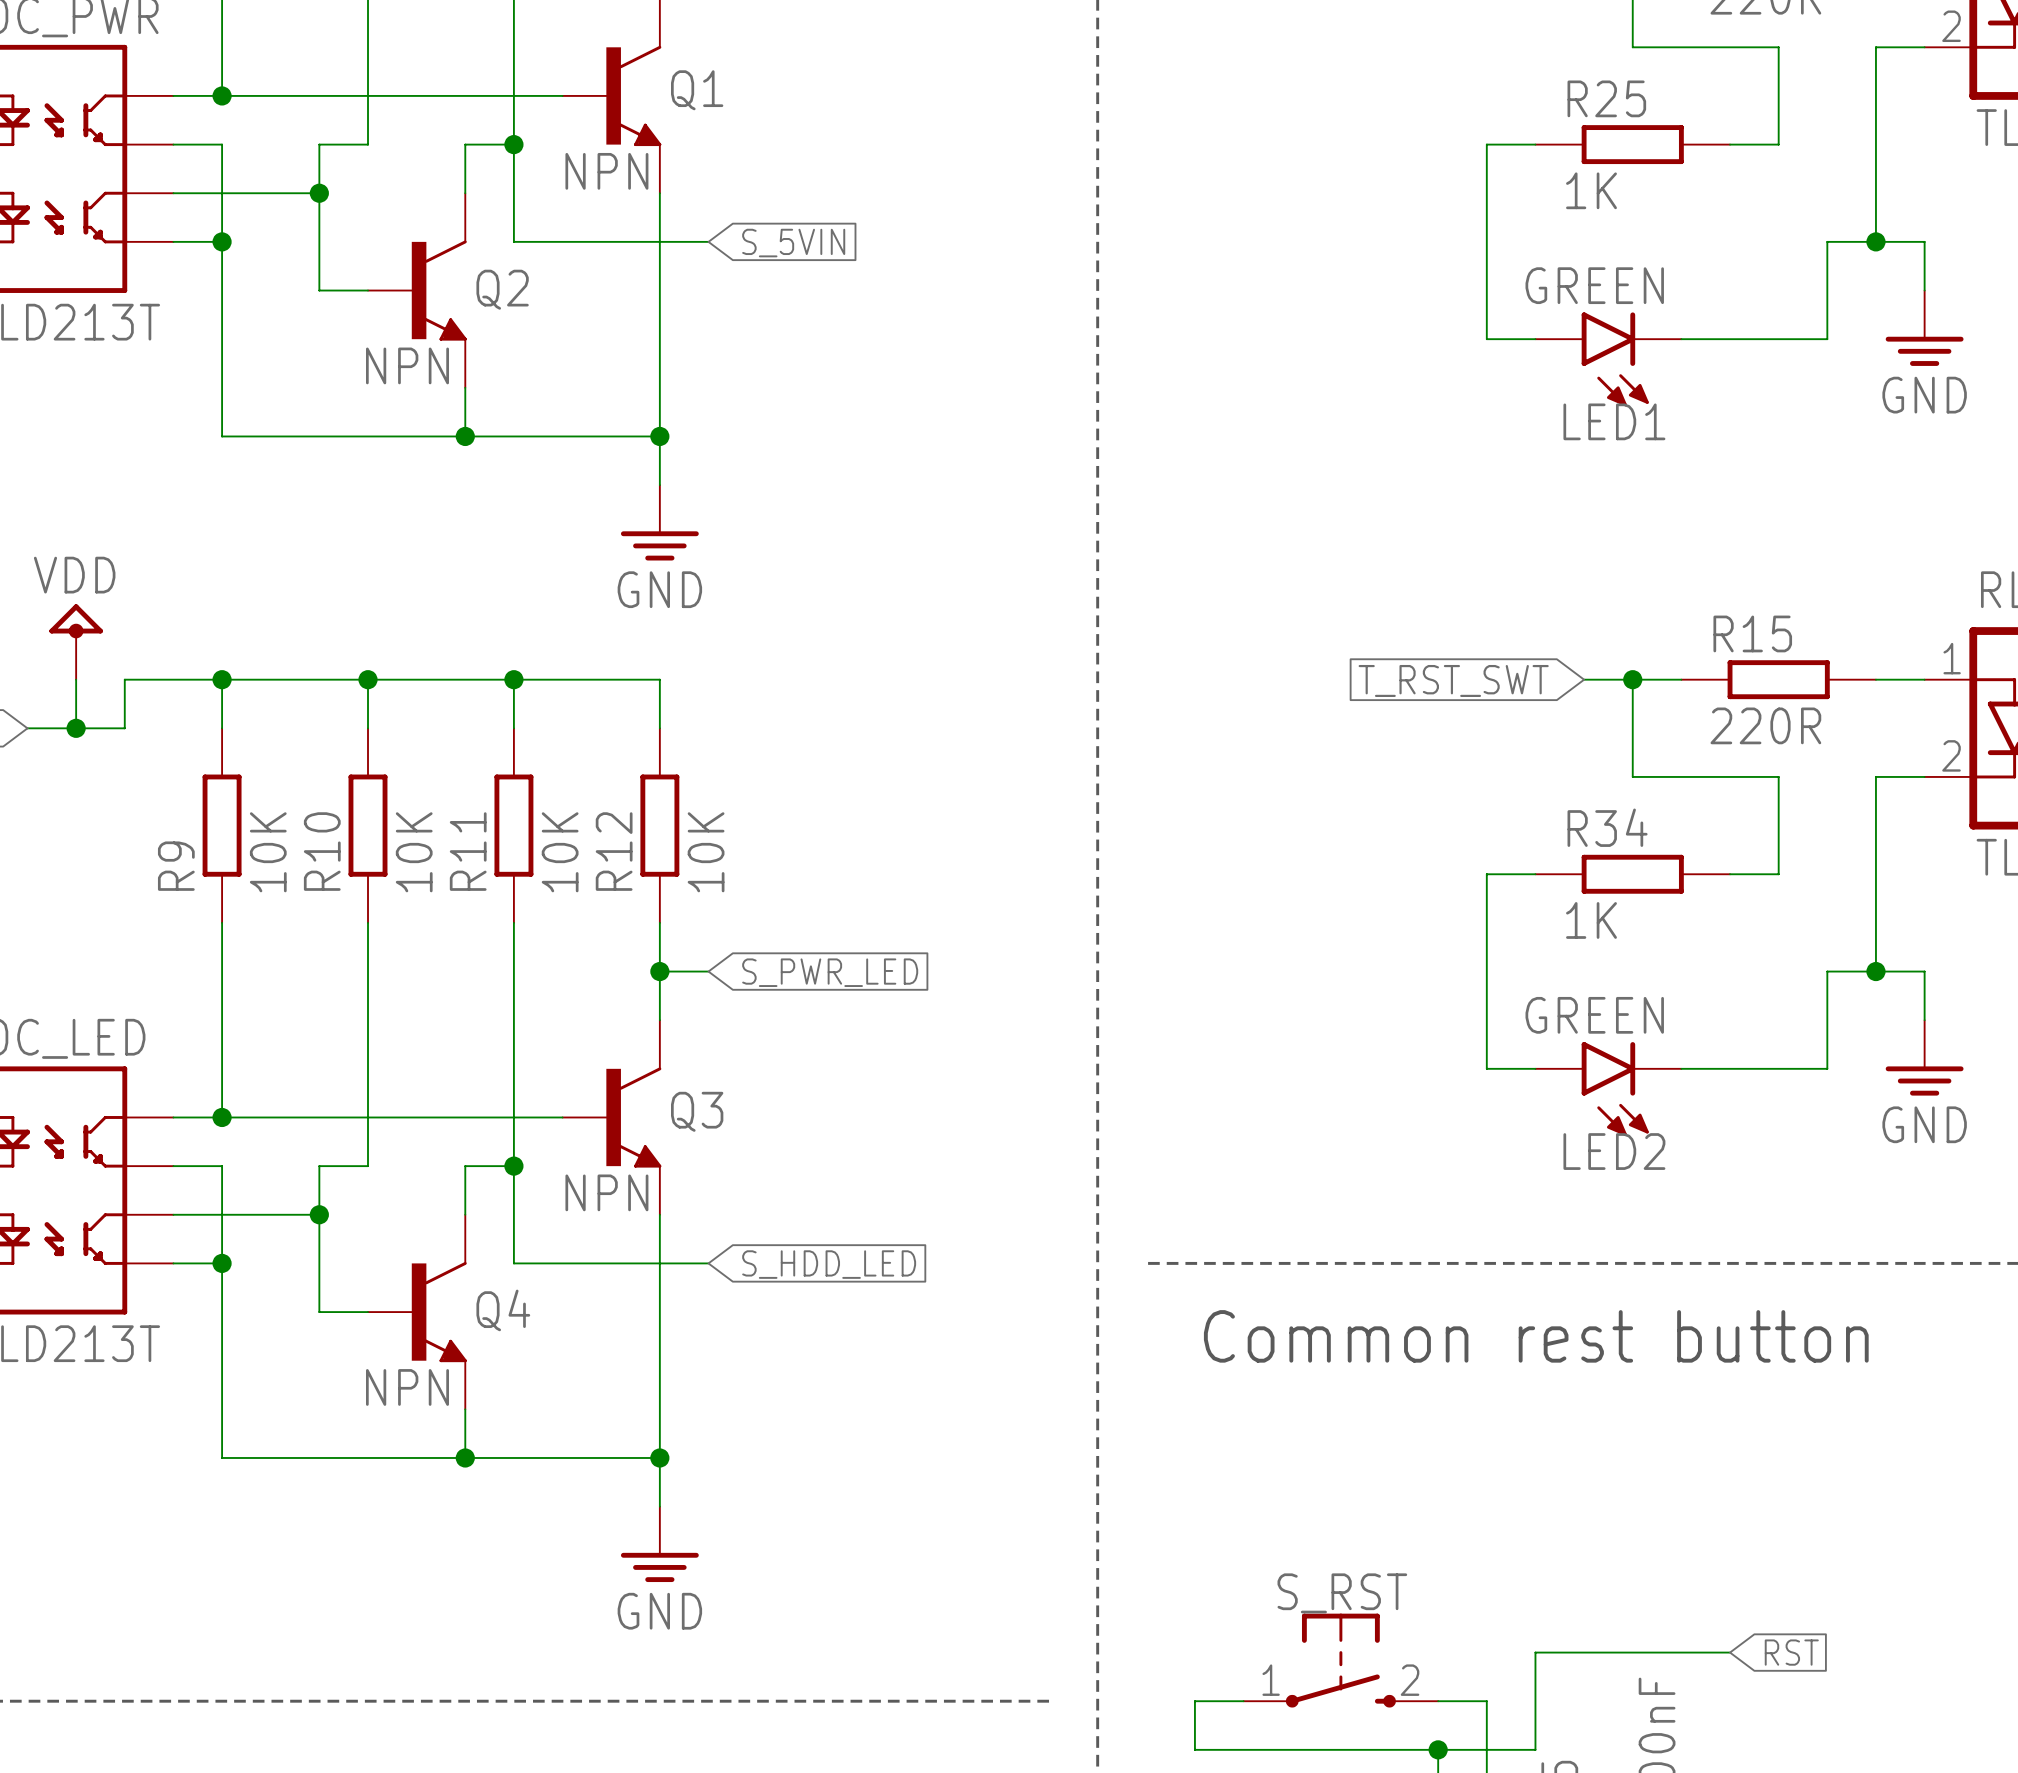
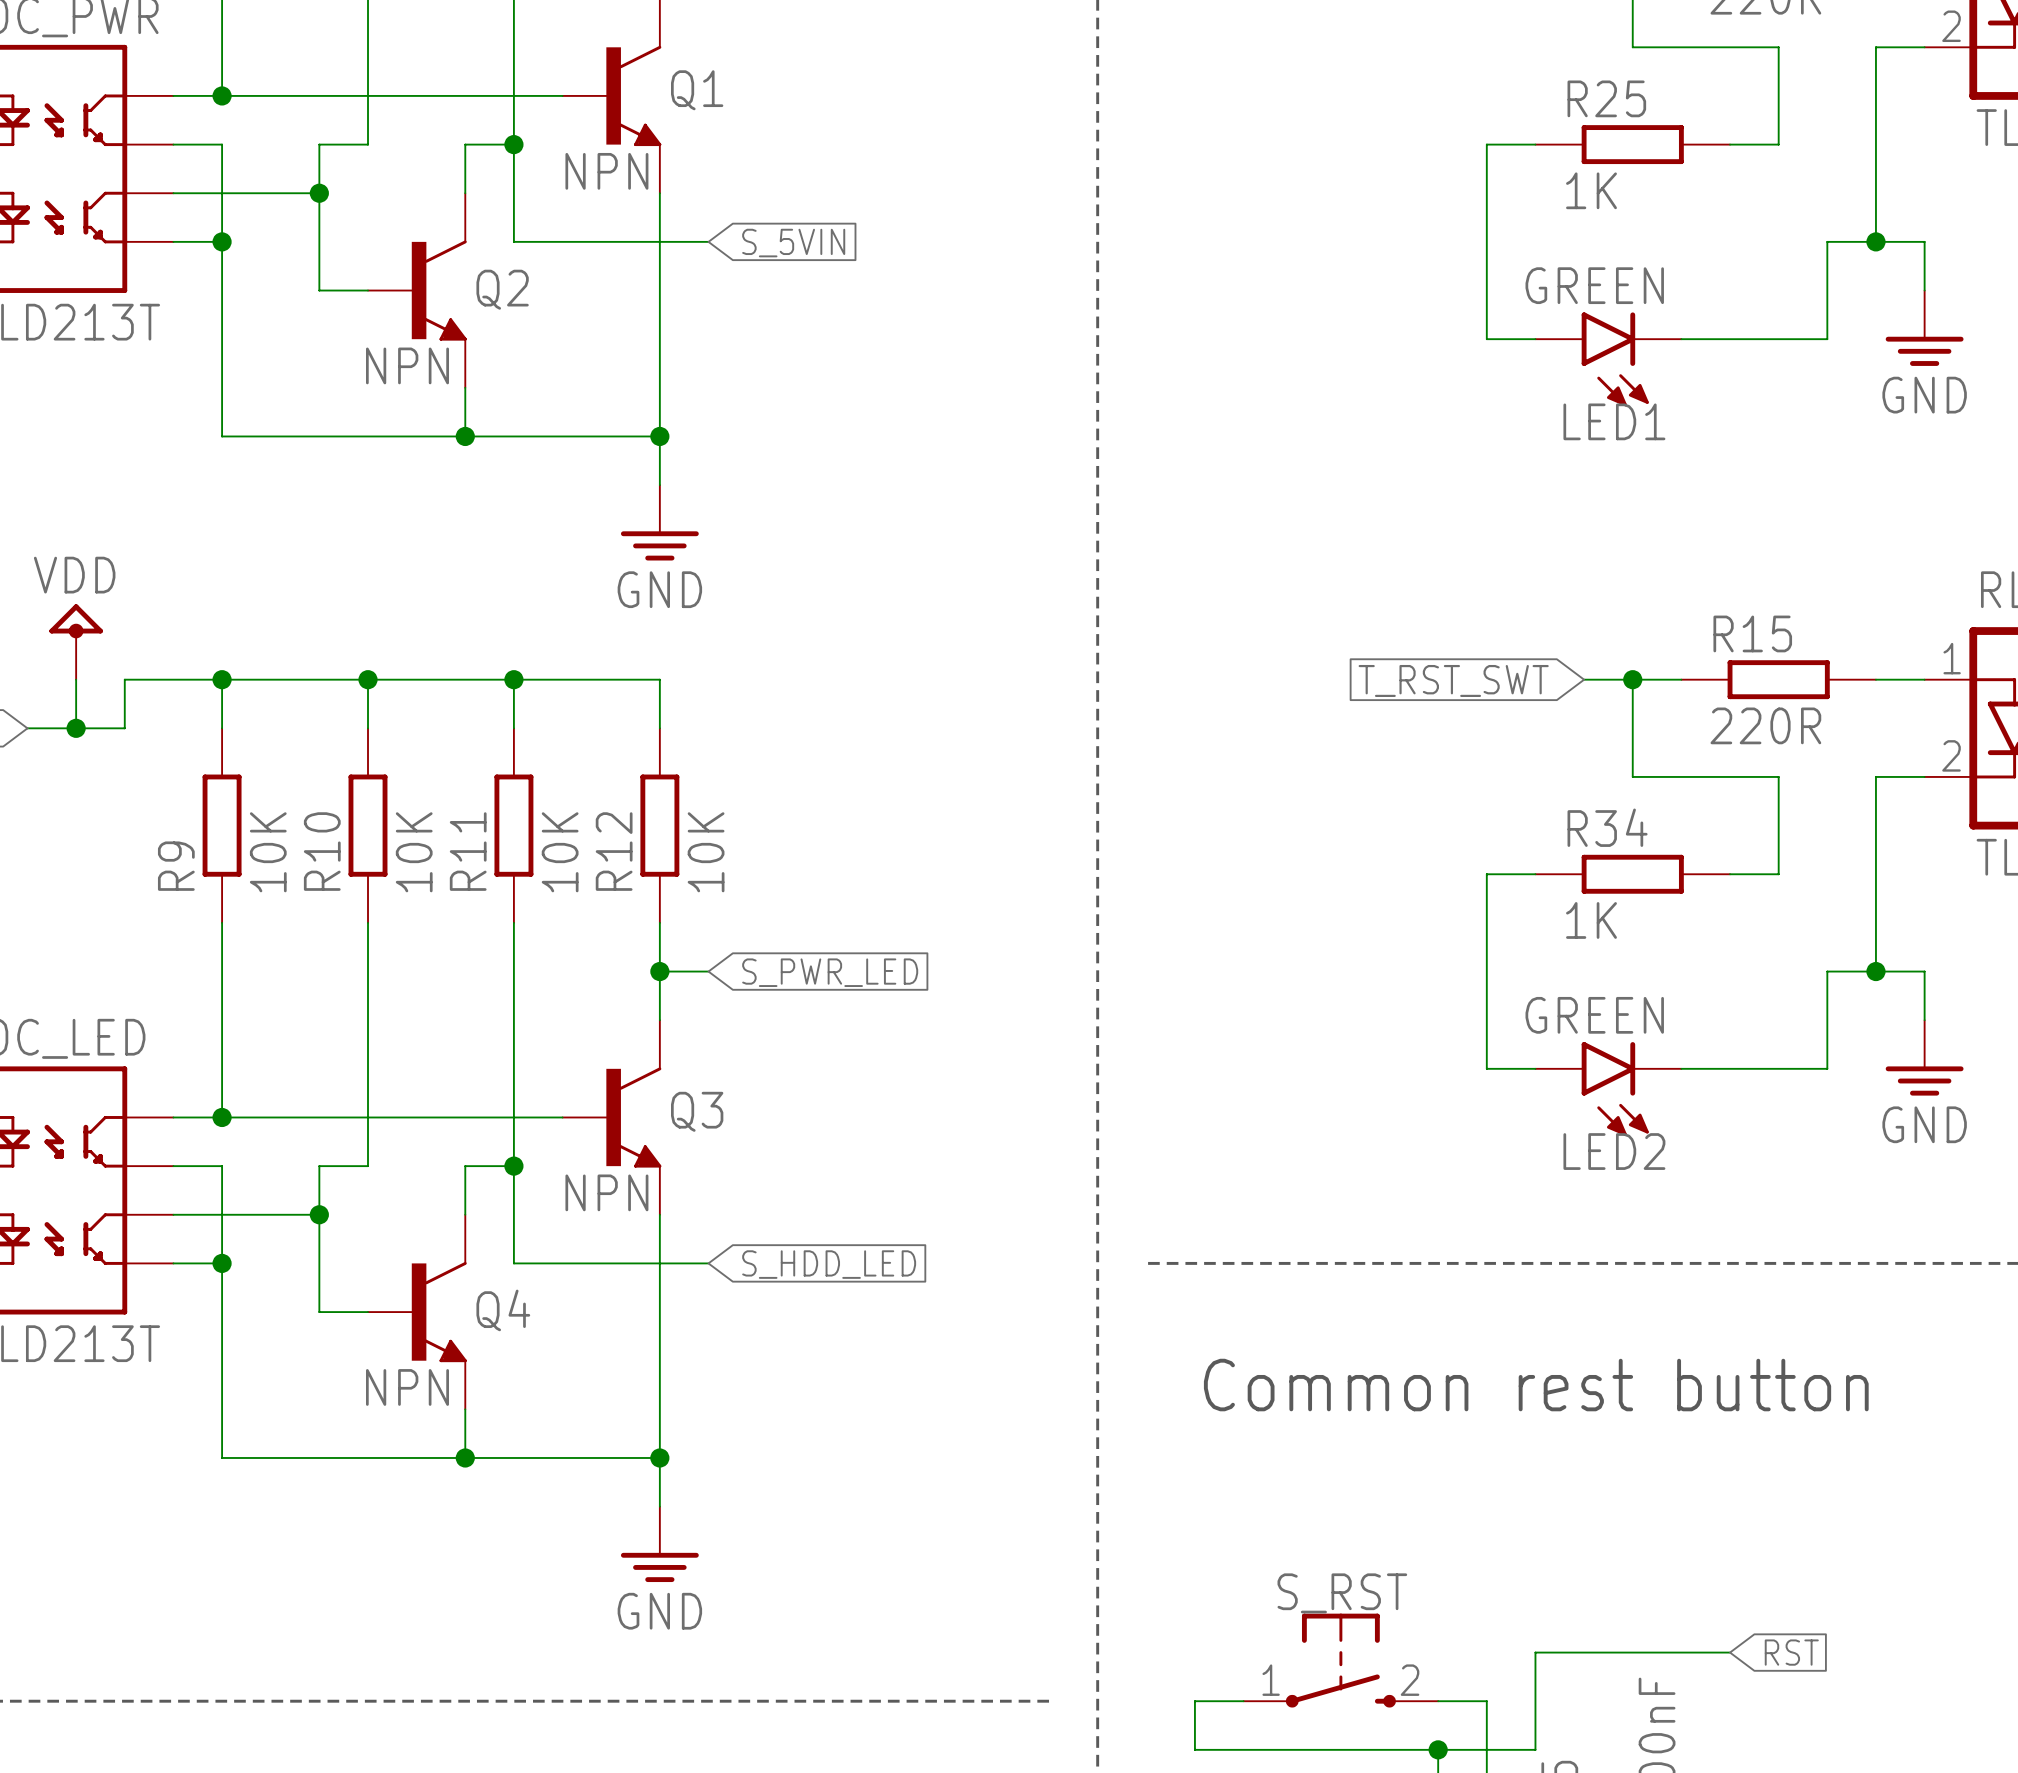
text position: Common rest button (1536, 1336) -> Common rest button (1536, 1385)

